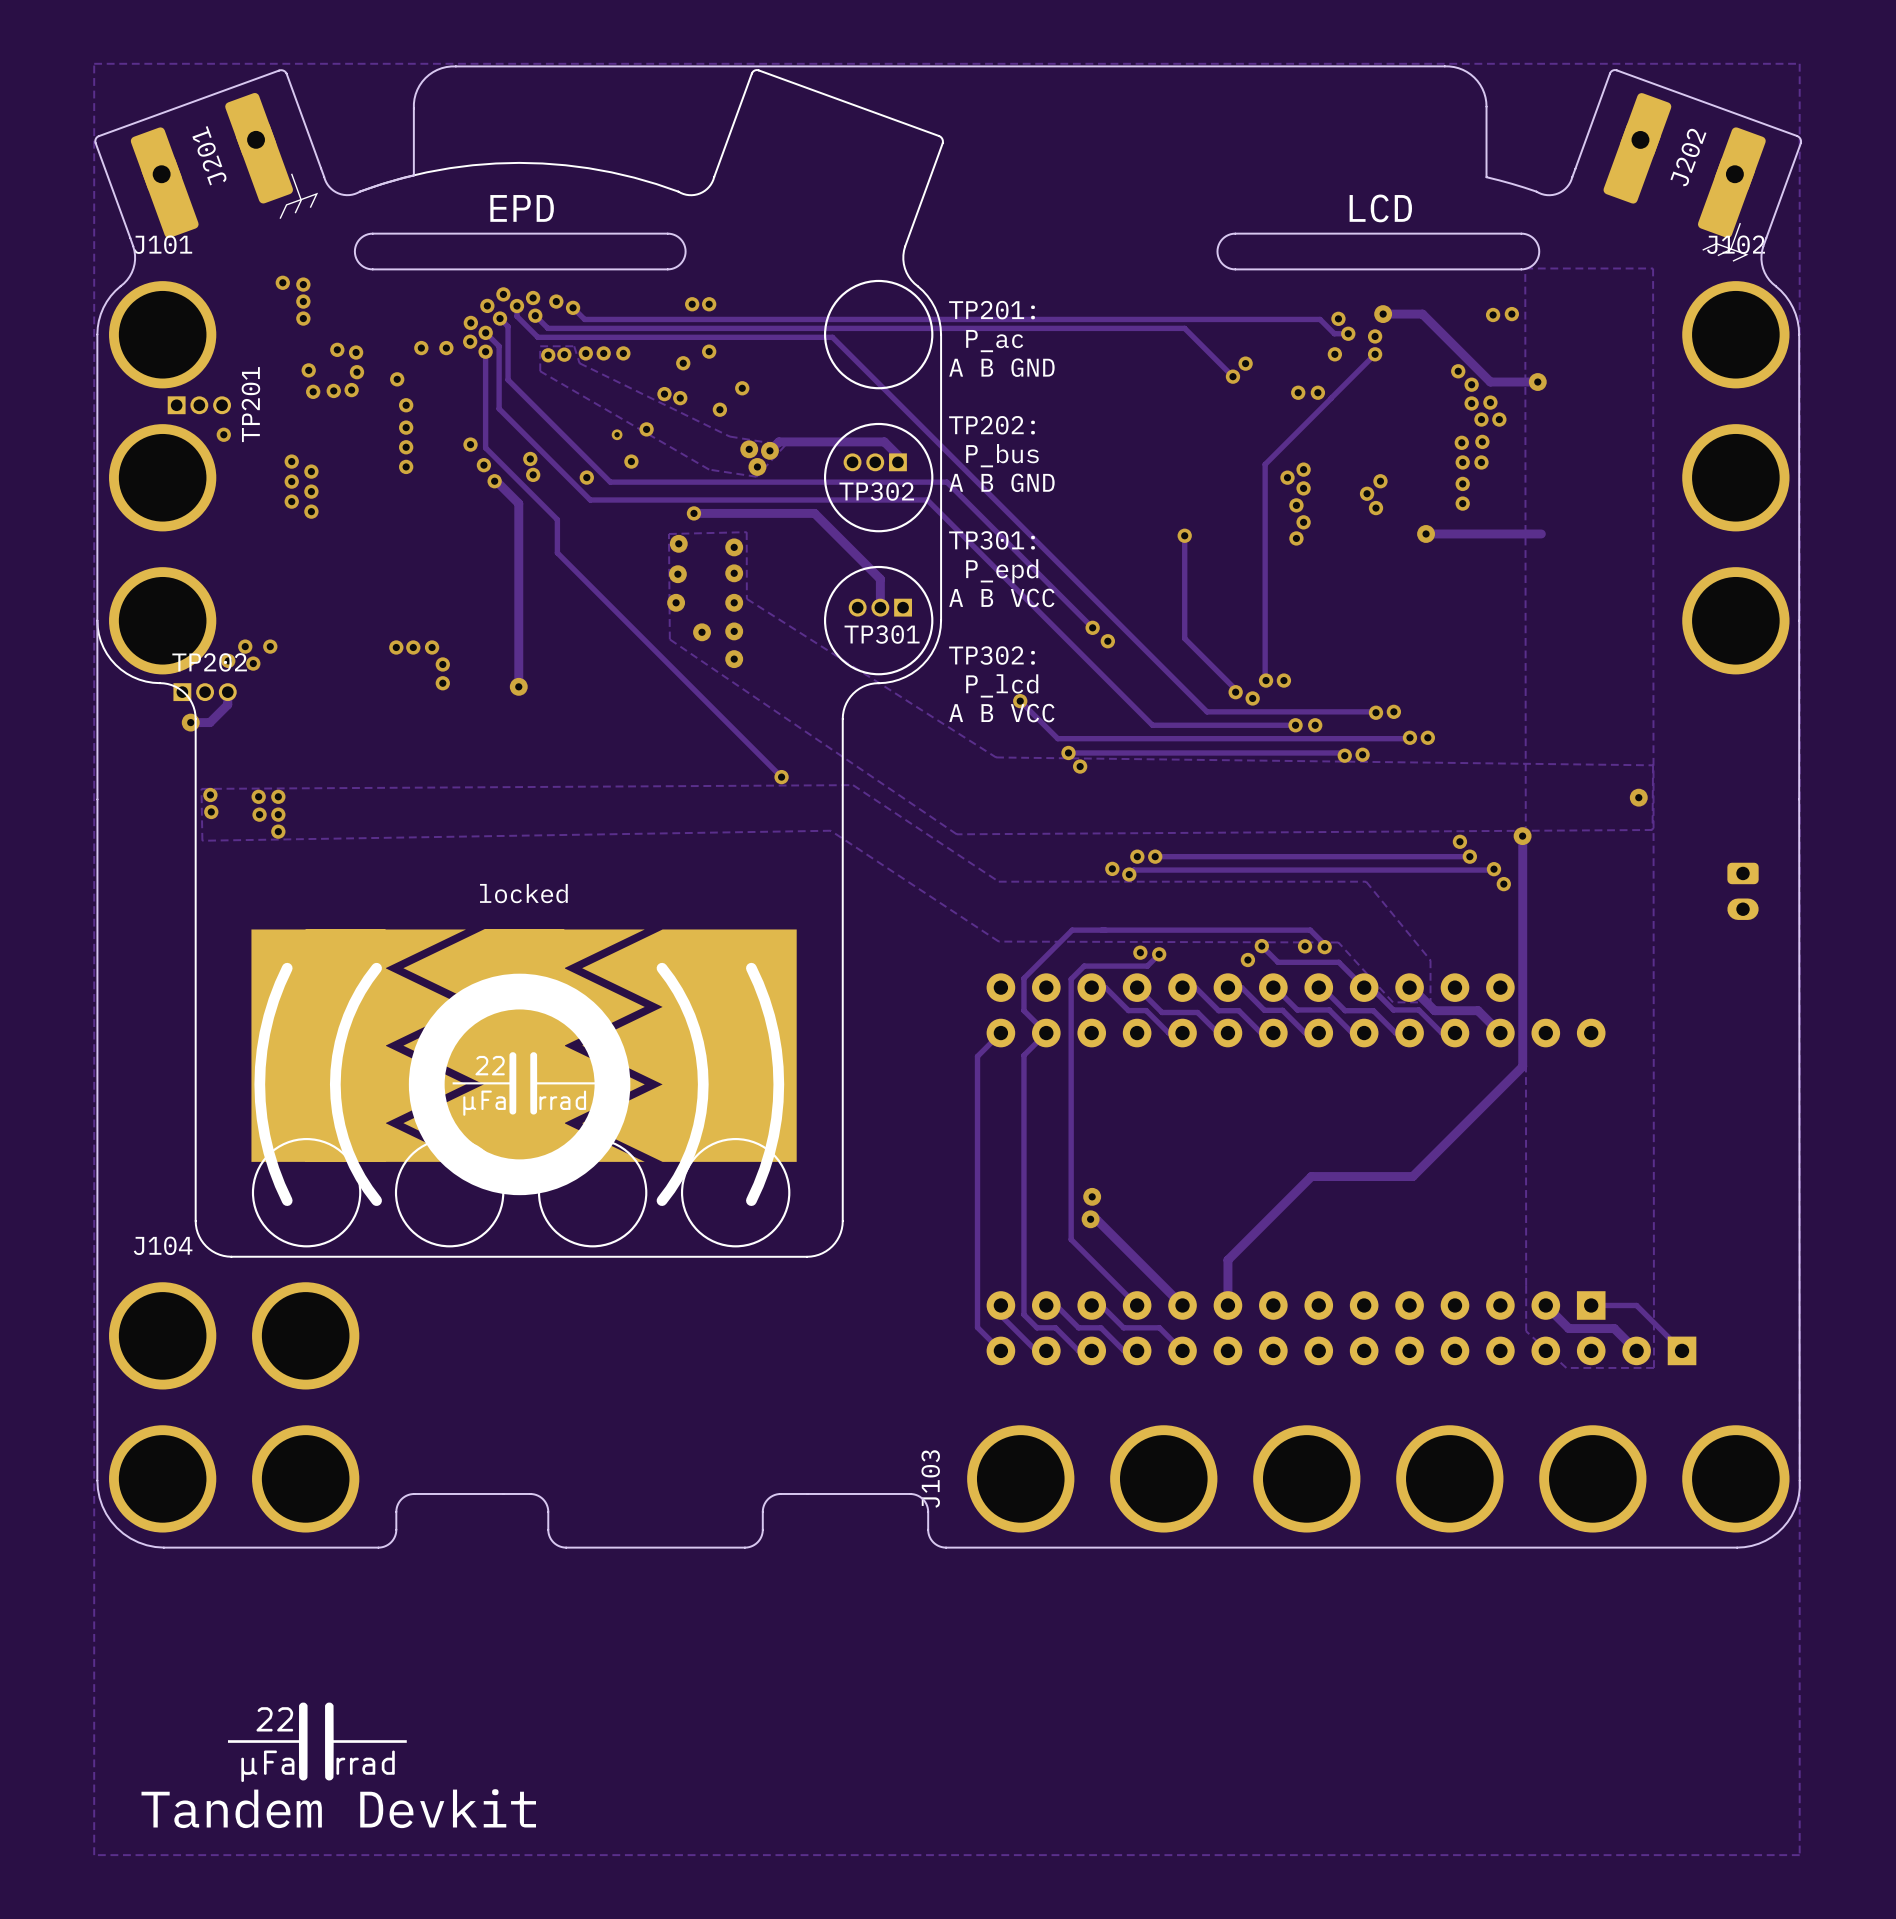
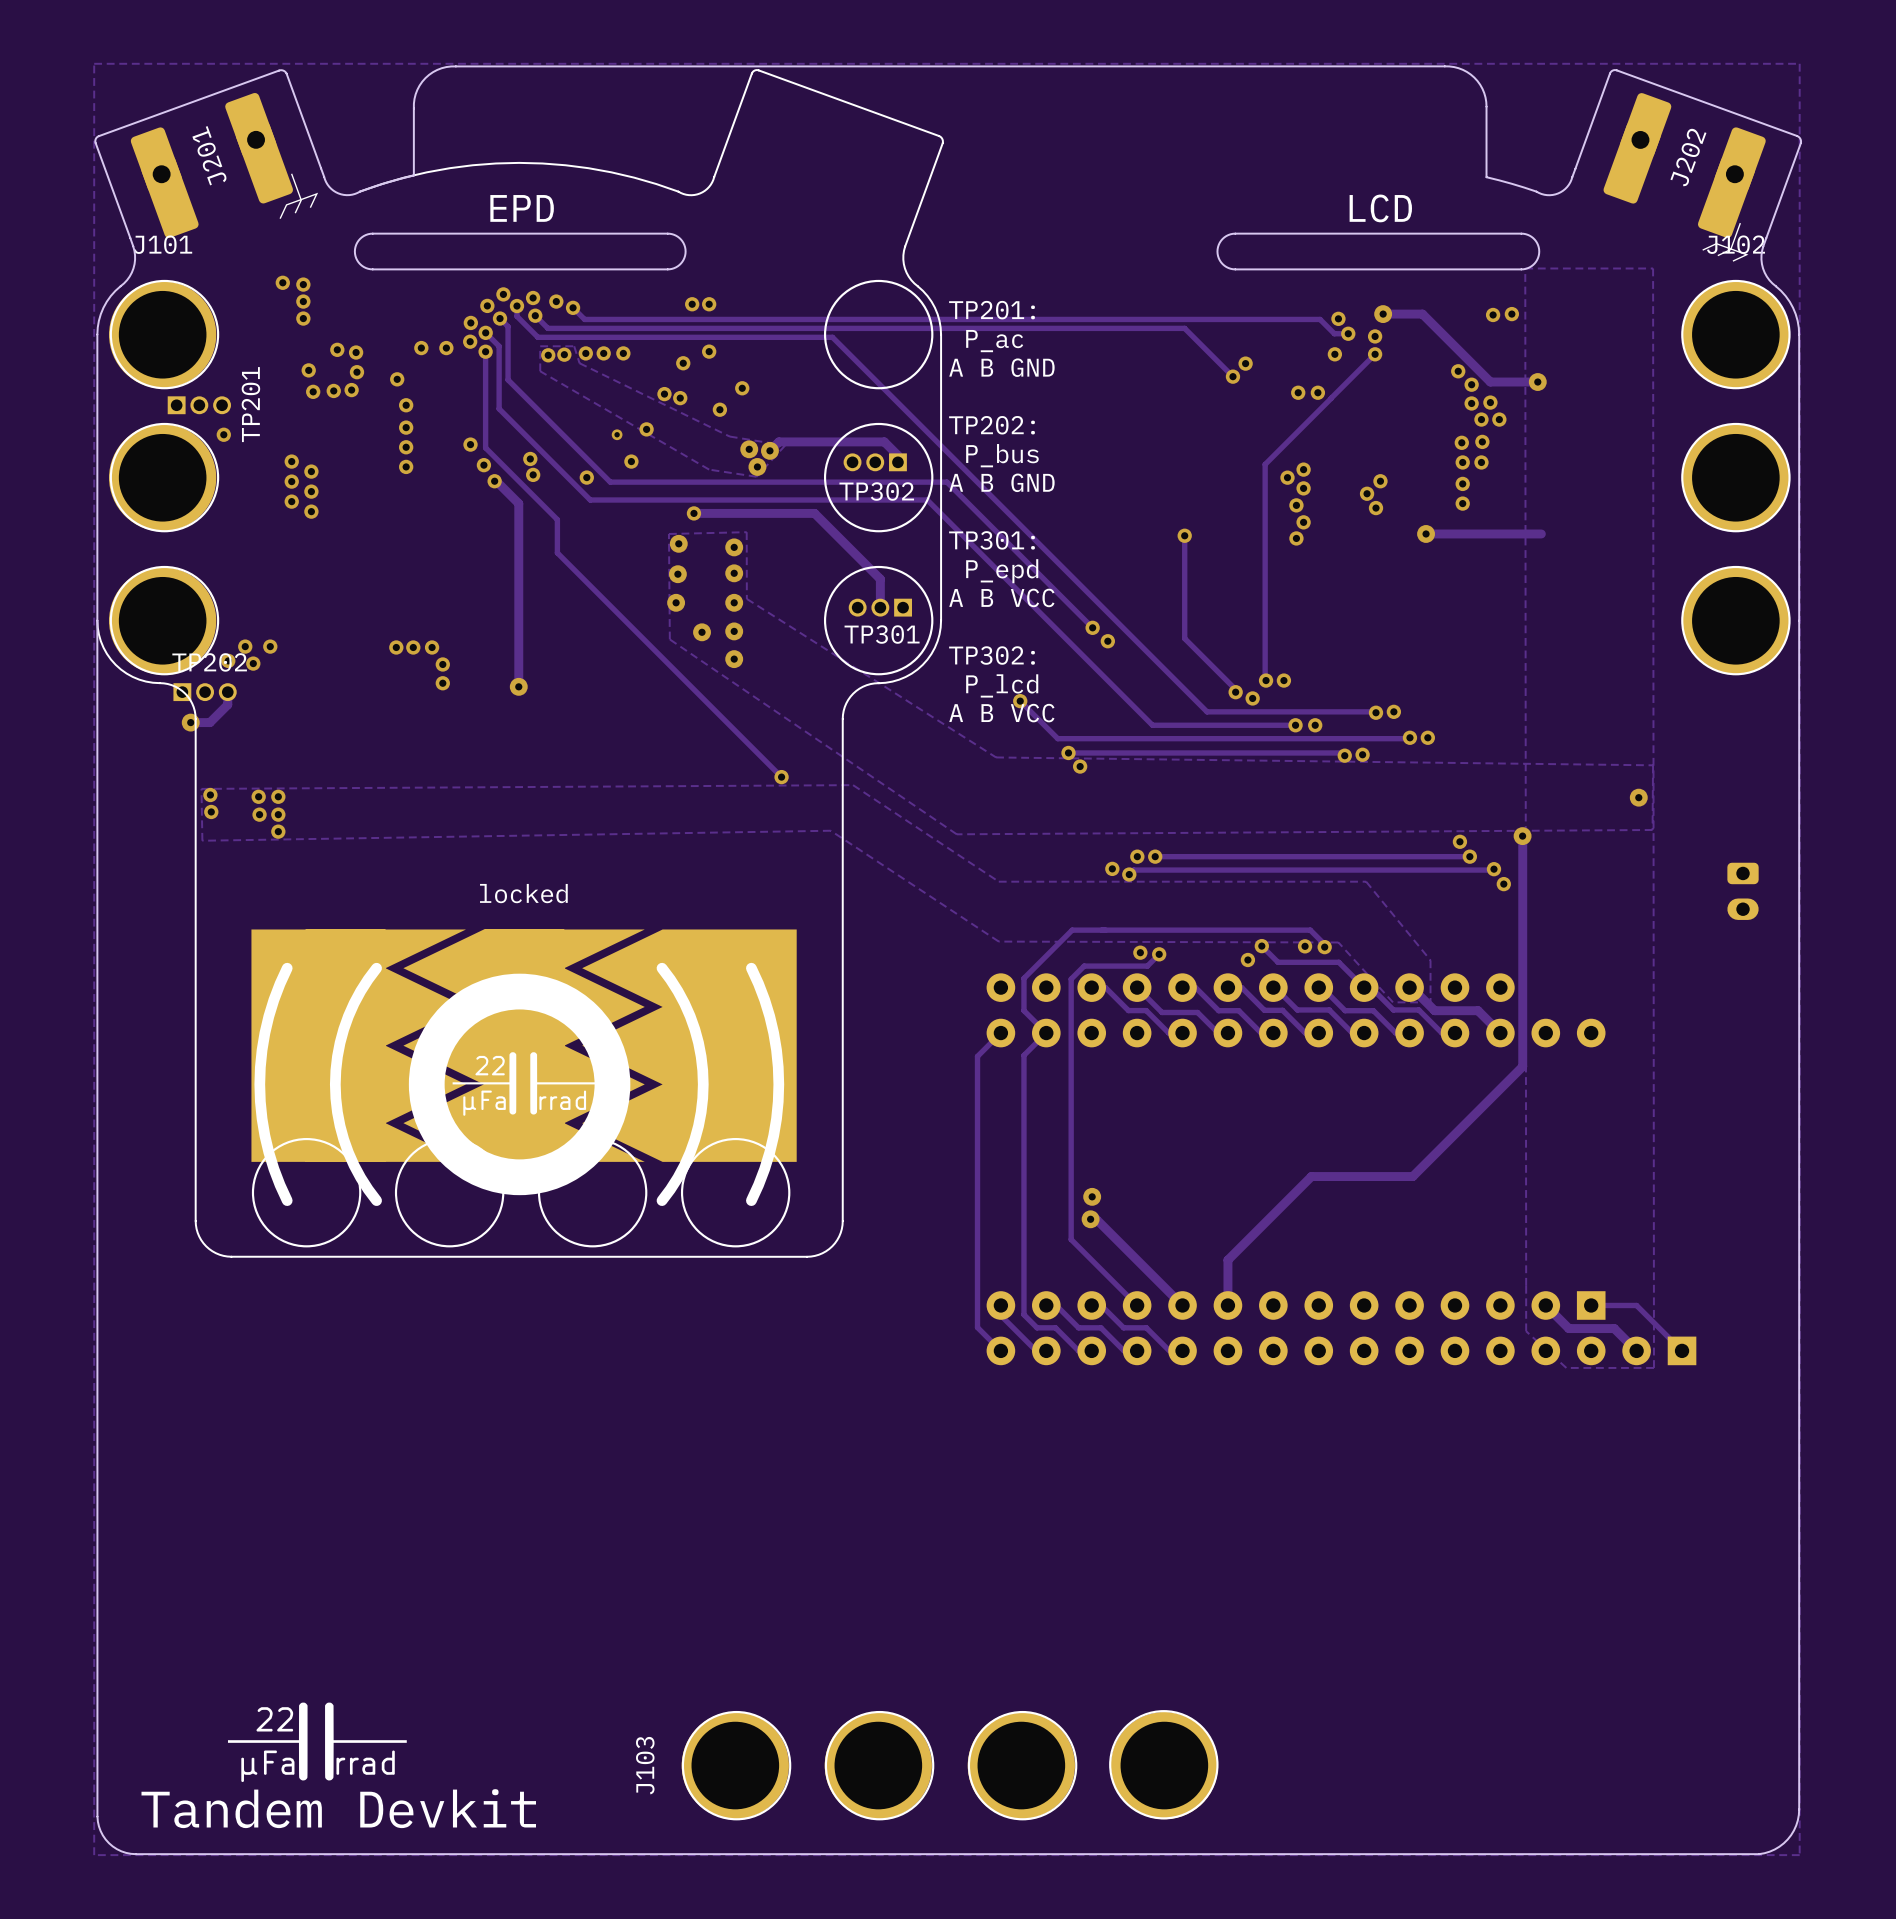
drawing: none -> [96, 65, 1800, 1855]
board edge: (97, 799) (97, 1489) (106, 1513) (123, 1533) (138, 1542) (163, 1547) (382, 1547) (391, 1542) (395, 1535) (396, 1509) (399, 1502) (406, 1495) (414, 1493) (536, 1494) (543, 1499) (547, 1505) (548, 1531) (551, 1539) (558, 1545) (566, 1547) (748, 1547) (756, 1543) (761, 1535) (762, 1509) (765, 1502) (771, 1496) (780, 1493) (916, 1494) (922, 1499) (927, 1505) (928, 1531) (930, 1539) (936, 1544) (946, 1547) (1737, 1547) (1751, 1545) (1765, 1540) (1777, 1532) (1787, 1522) (1797, 1502) (1799, 1487) (1799, 799) -> none
track: (1146, 1327) (1159, 1327) (1182, 1350) -> (1146, 1327) (1169, 1350)
J104: (234, 1407) -> none
J103 footprint: [967, 1425, 1790, 1533] -> [681, 1711, 1219, 1820]
J103 name position: J103 (930, 1478) -> J103 (645, 1765)

